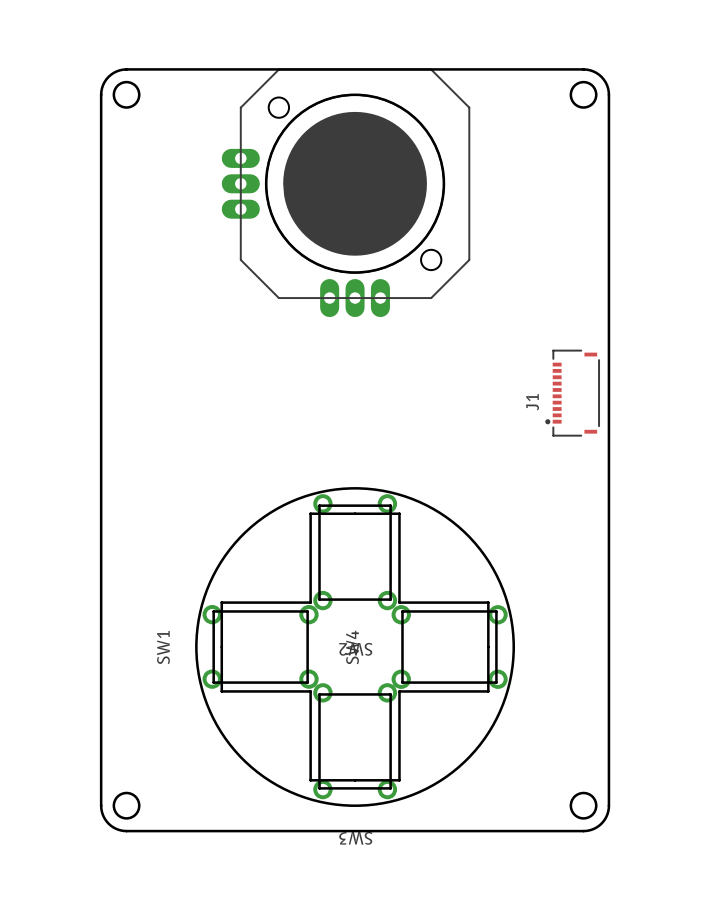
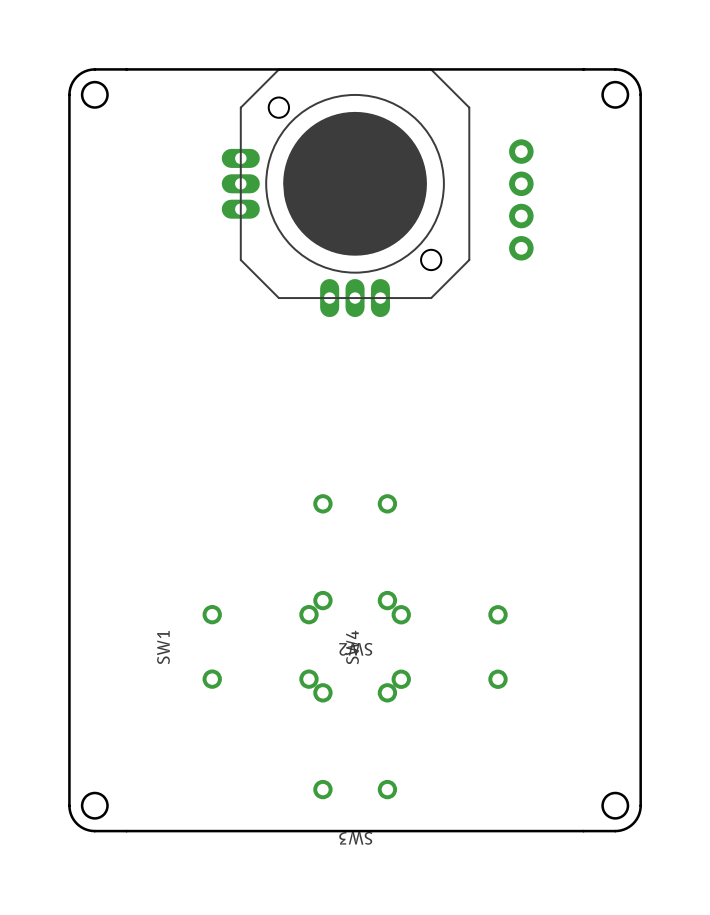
board edge: (126, 69) (116, 71) (108, 76) (103, 85) (101, 94) (101, 805) (103, 816) (108, 823) (118, 829) (126, 831) -> (126, 69) (85, 71) (72, 82) (69, 94) (69, 808) (74, 821) (86, 829) (126, 831)
board edge: (583, 69) (593, 71) (601, 76) (607, 85) (608, 94) (608, 805) (606, 816) (601, 823) (591, 829) (583, 831) -> (583, 69) (625, 71) (635, 79) (640, 94) (640, 808) (635, 821) (623, 829) (583, 831)
round board edge: [264, 93, 446, 274] -> none
round board edge position: (126, 94) -> (94, 94)
round board edge position: (583, 94) -> (615, 94)
part: none -> (521, 199)
J1: (572, 393) -> none
round board edge: [195, 487, 516, 807] -> none
board edge: (319, 505) (319, 599) (390, 599) (390, 505) (319, 505) -> none
board edge: (310, 513) (399, 513) (399, 602) (488, 602) (488, 691) (399, 691) (399, 780) (310, 780) (310, 691) (221, 691) (221, 602) (310, 602) (310, 513) -> none
board edge: (213, 611) (307, 611) (307, 682) (213, 682) (213, 611) -> none
board edge: (402, 611) (496, 611) (496, 682) (402, 682) (402, 611) -> none
board edge: (319, 694) (390, 694) (390, 788) (319, 788) (319, 694) -> none
round board edge position: (126, 805) -> (94, 805)
round board edge position: (583, 805) -> (615, 805)

